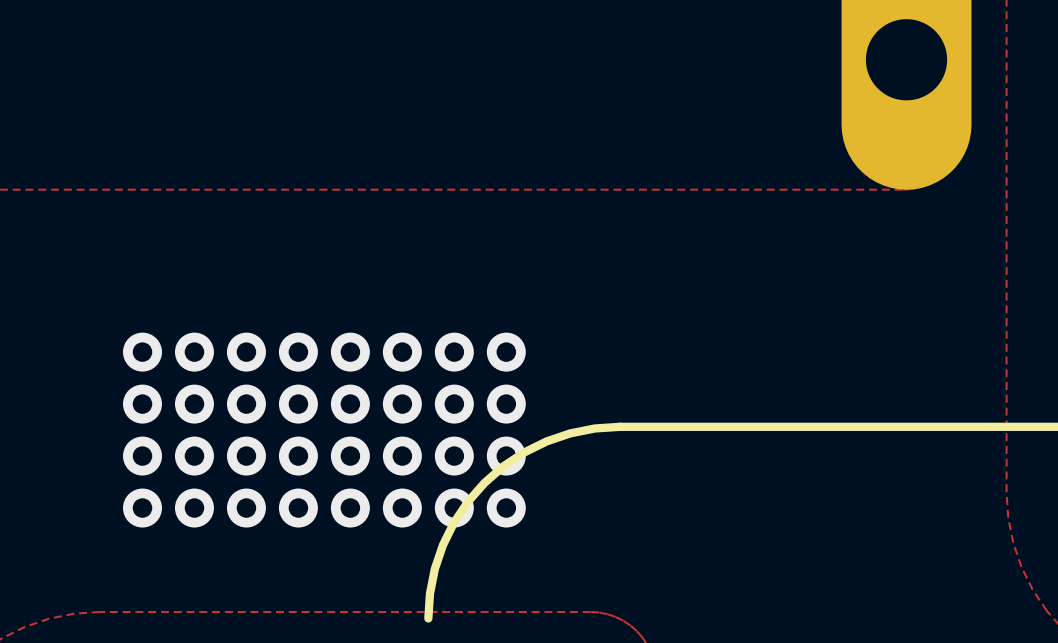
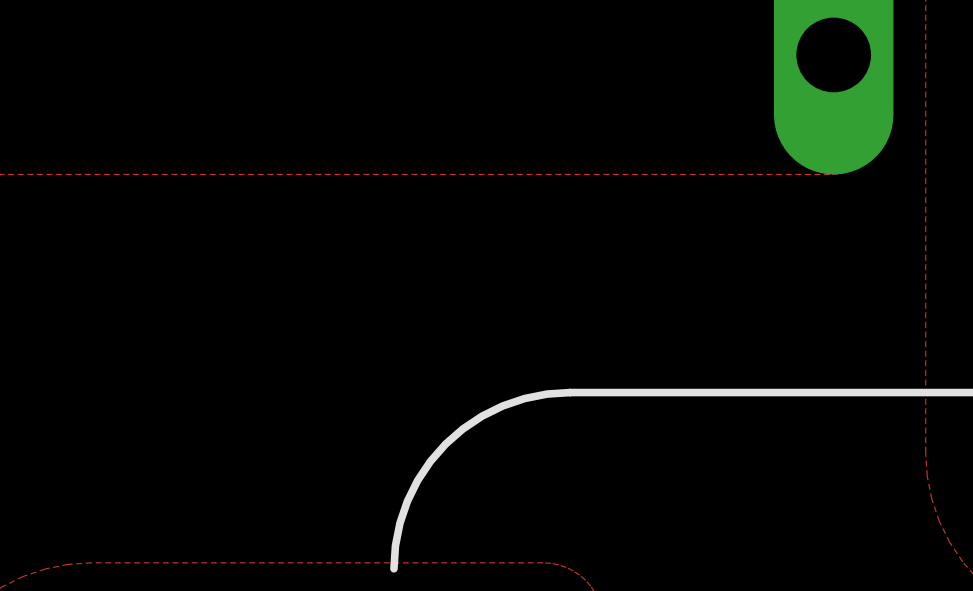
via: (142, 352) -> none
via: (194, 352) -> none
via: (246, 352) -> none
via: (298, 352) -> none
via: (350, 352) -> none
via: (402, 352) -> none
via: (454, 352) -> none
via: (506, 352) -> none
via: (142, 404) -> none
via: (194, 404) -> none
via: (246, 404) -> none
via: (298, 404) -> none
via: (350, 404) -> none
via: (402, 404) -> none
via: (454, 404) -> none
via: (506, 404) -> none
via: (142, 456) -> none
via: (194, 456) -> none
via: (246, 456) -> none
via: (298, 456) -> none
via: (350, 456) -> none
via: (402, 456) -> none
via: (454, 456) -> none
via: (506, 456) -> none
via: (142, 508) -> none
via: (194, 508) -> none
via: (246, 508) -> none
via: (298, 508) -> none
via: (350, 508) -> none
via: (402, 508) -> none
via: (454, 508) -> none
via: (506, 508) -> none

